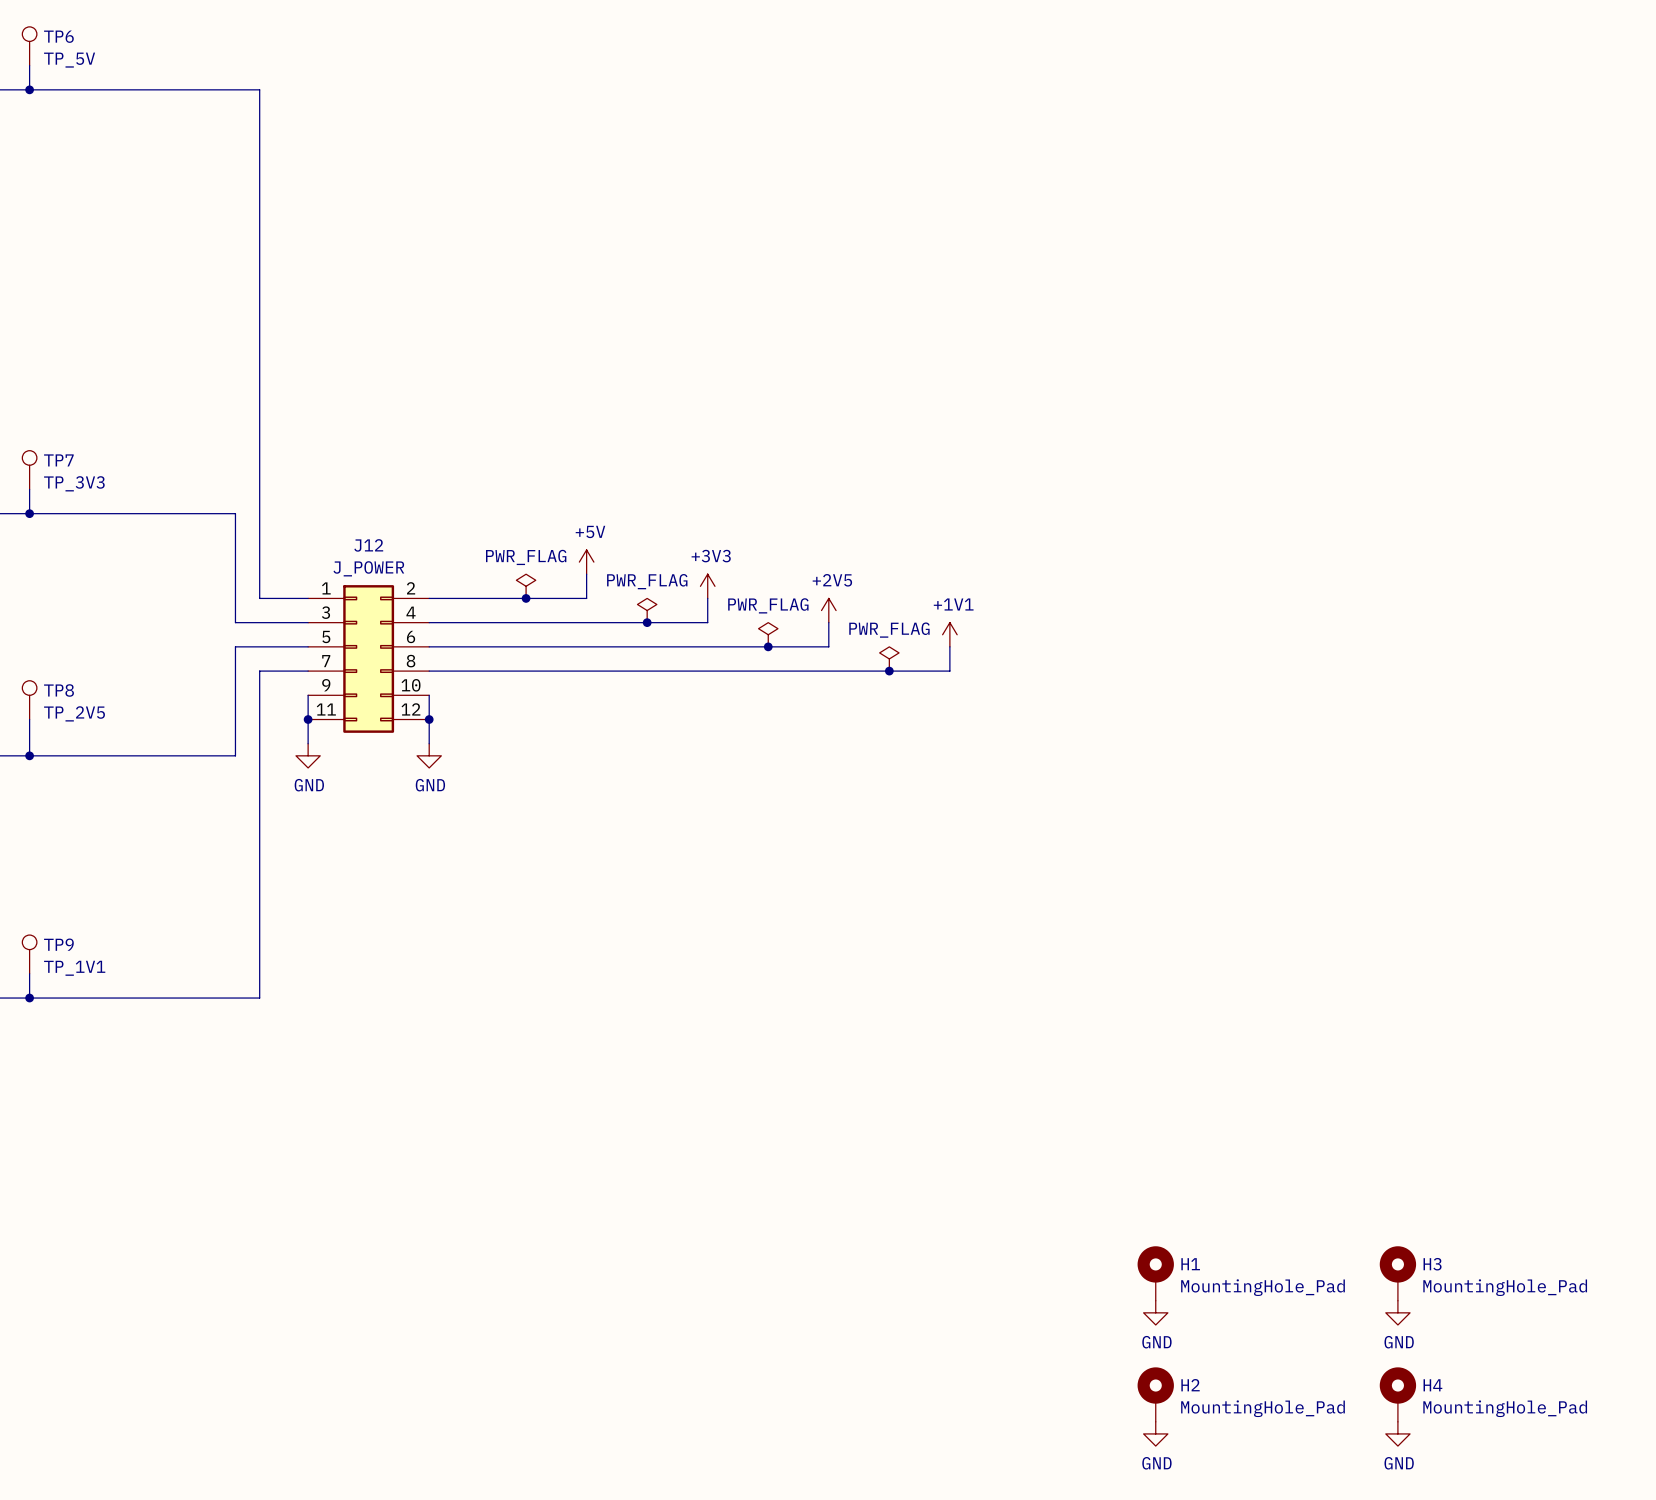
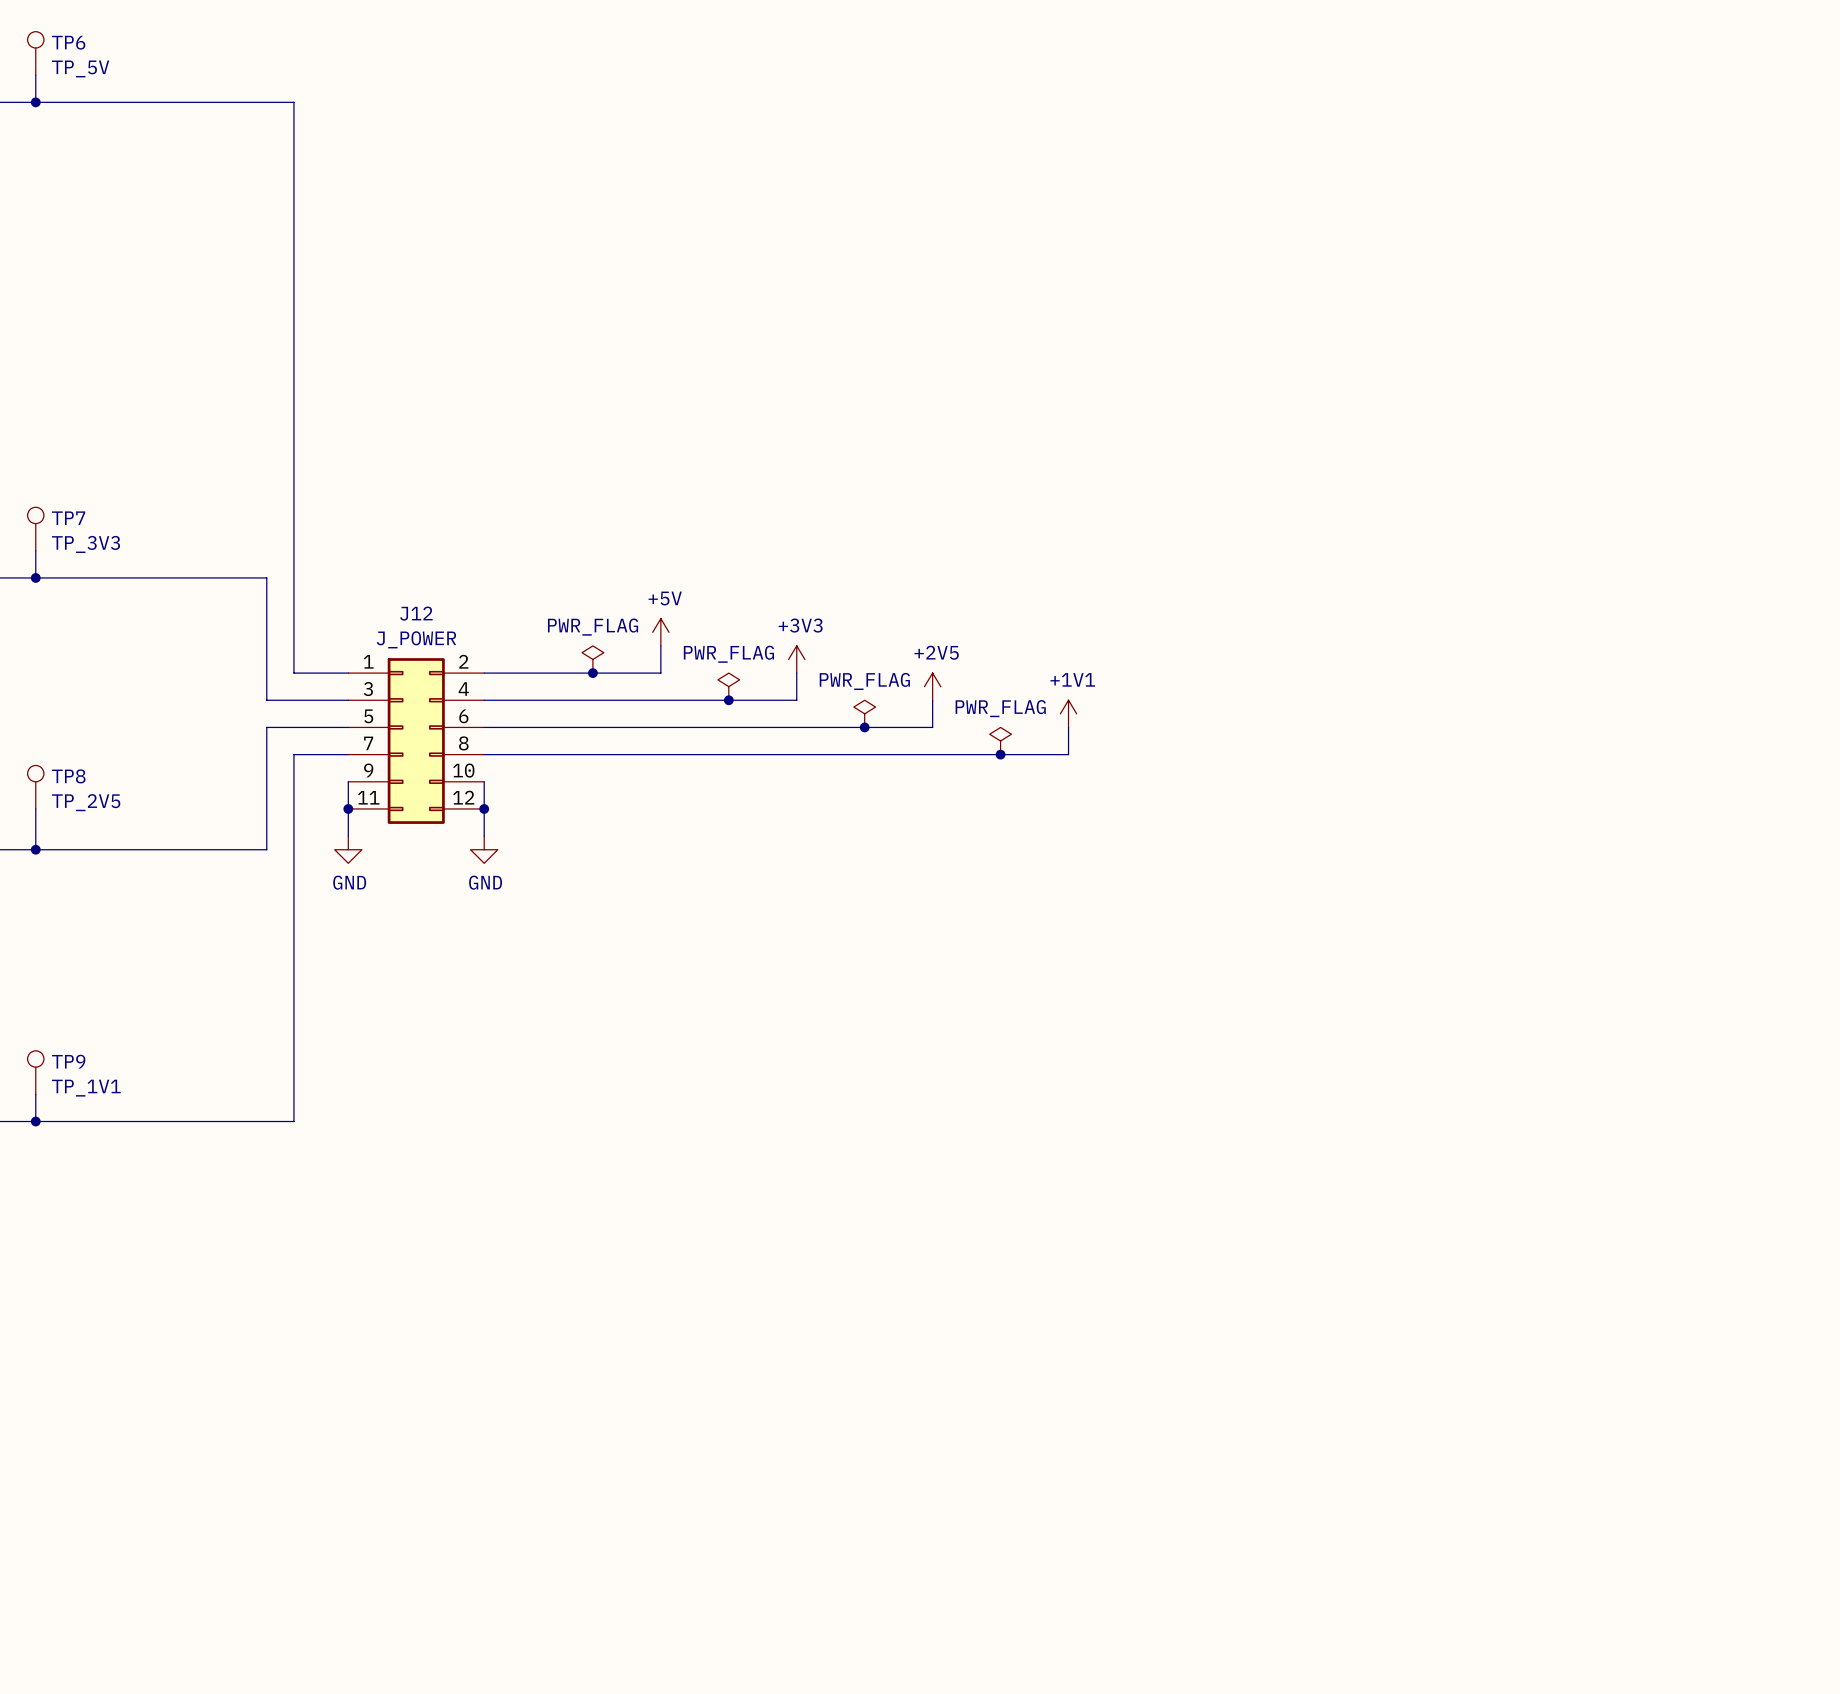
H1: MountingHole_Pad (1155, 1273) -> none
H3: MountingHole_Pad (1397, 1273) -> none
power symbol: GND (1155, 1312) -> none
power symbol: GND (1397, 1312) -> none
H2: MountingHole_Pad (1155, 1394) -> none
H4: MountingHole_Pad (1397, 1394) -> none
power symbol: GND (1155, 1433) -> none
power symbol: GND (1397, 1433) -> none

